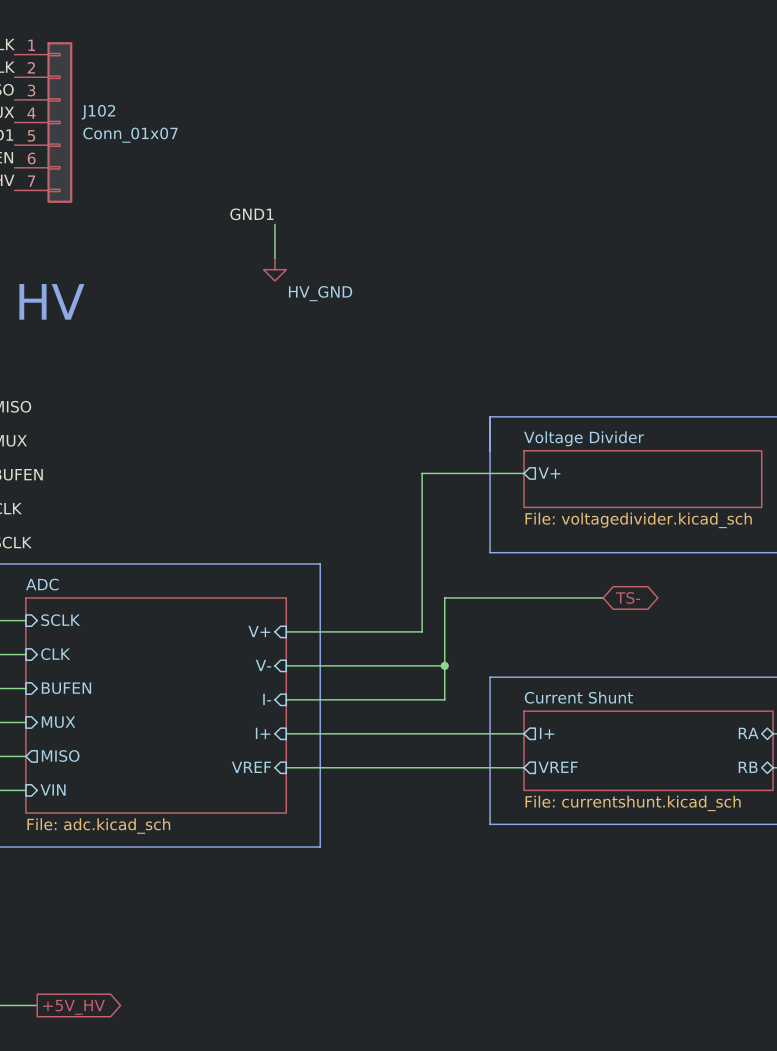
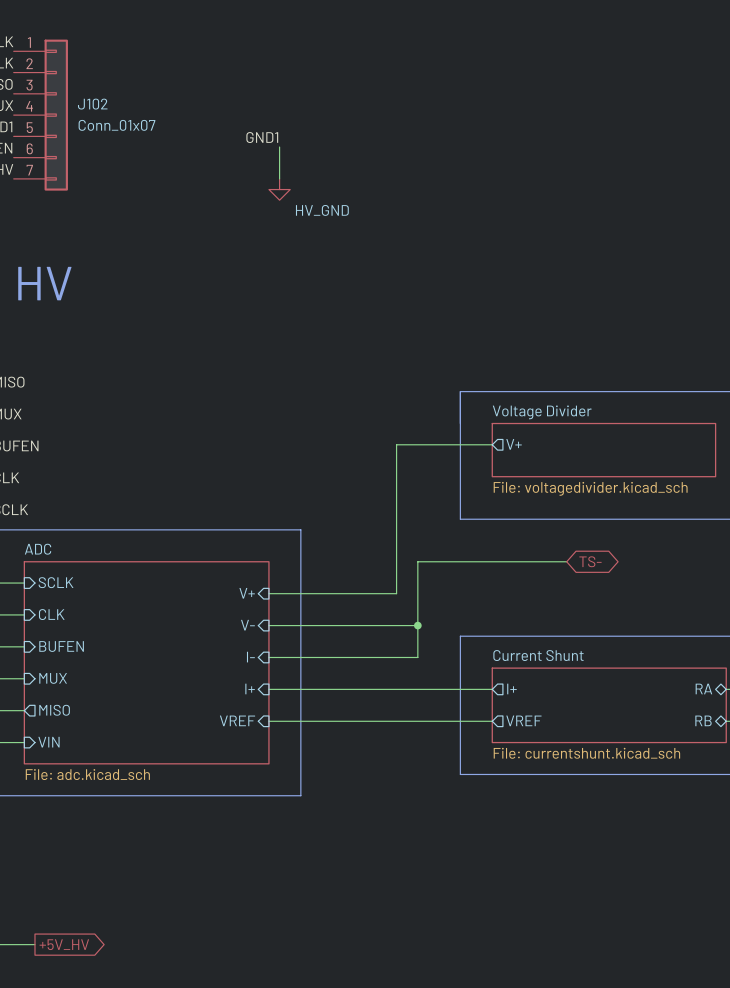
label position: GND1 (251, 214) -> GND1 (262, 137)
wire: (274, 224) (274, 258) -> (279, 147) (279, 178)
power symbol position: HV_GND (274, 269) -> HV_GND (279, 189)

